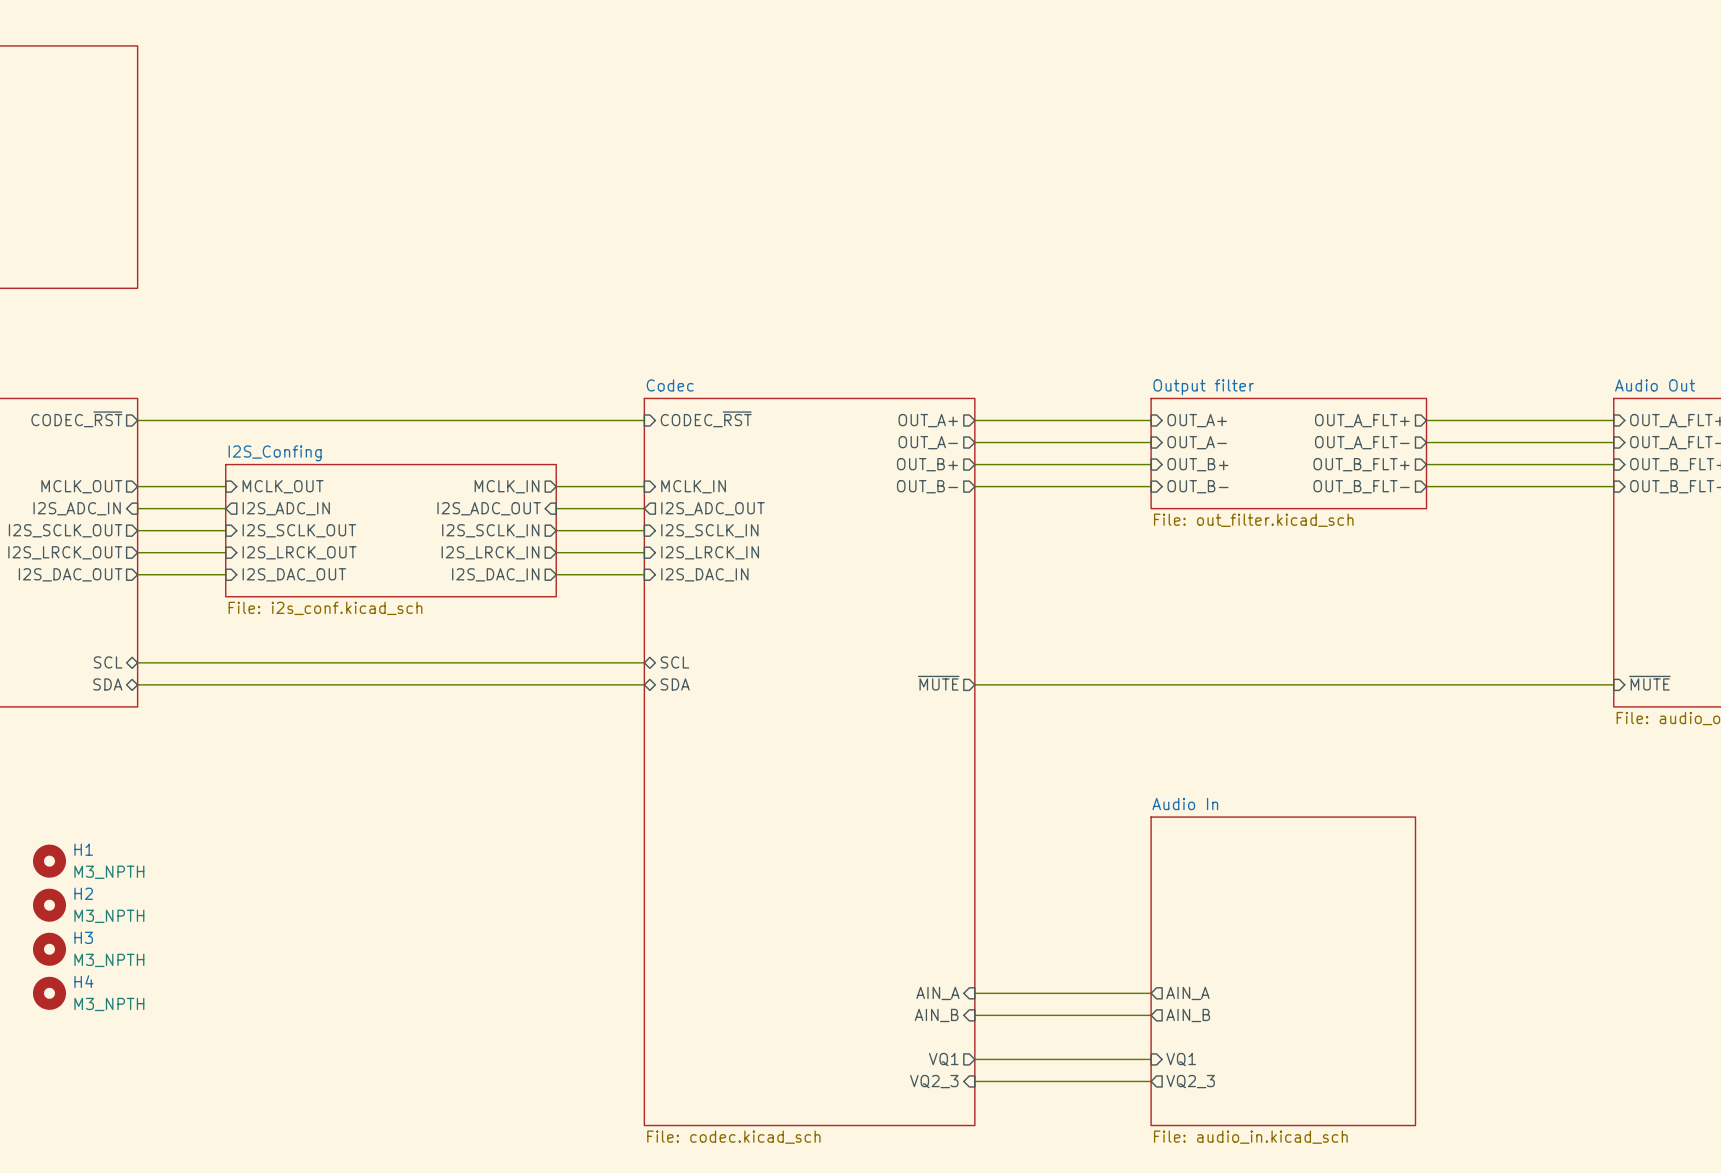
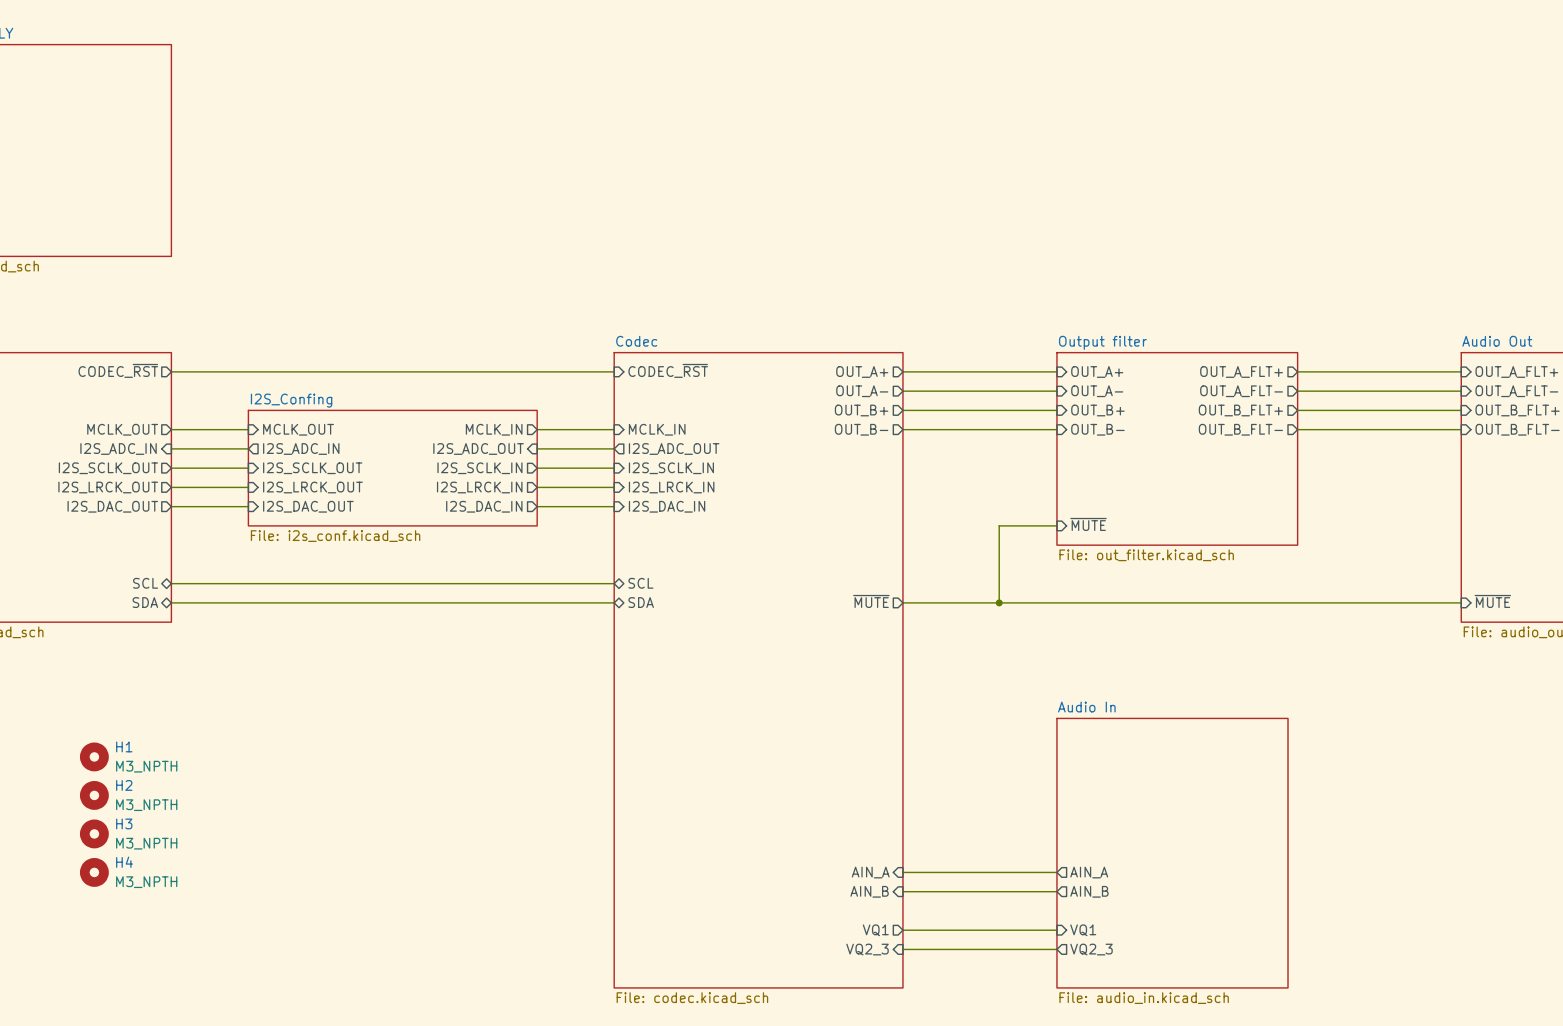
sheet Output filter: File: out_filter.kicad_sch (1288, 453) -> none
sheet Output filter: none -> File: out_filter.kicad_sch (1177, 448)
sheet pin: none -> ~{MUTE} (1088, 524)
wire: none -> (1056, 525) (999, 525) (999, 602)
junction: none -> (999, 602)

